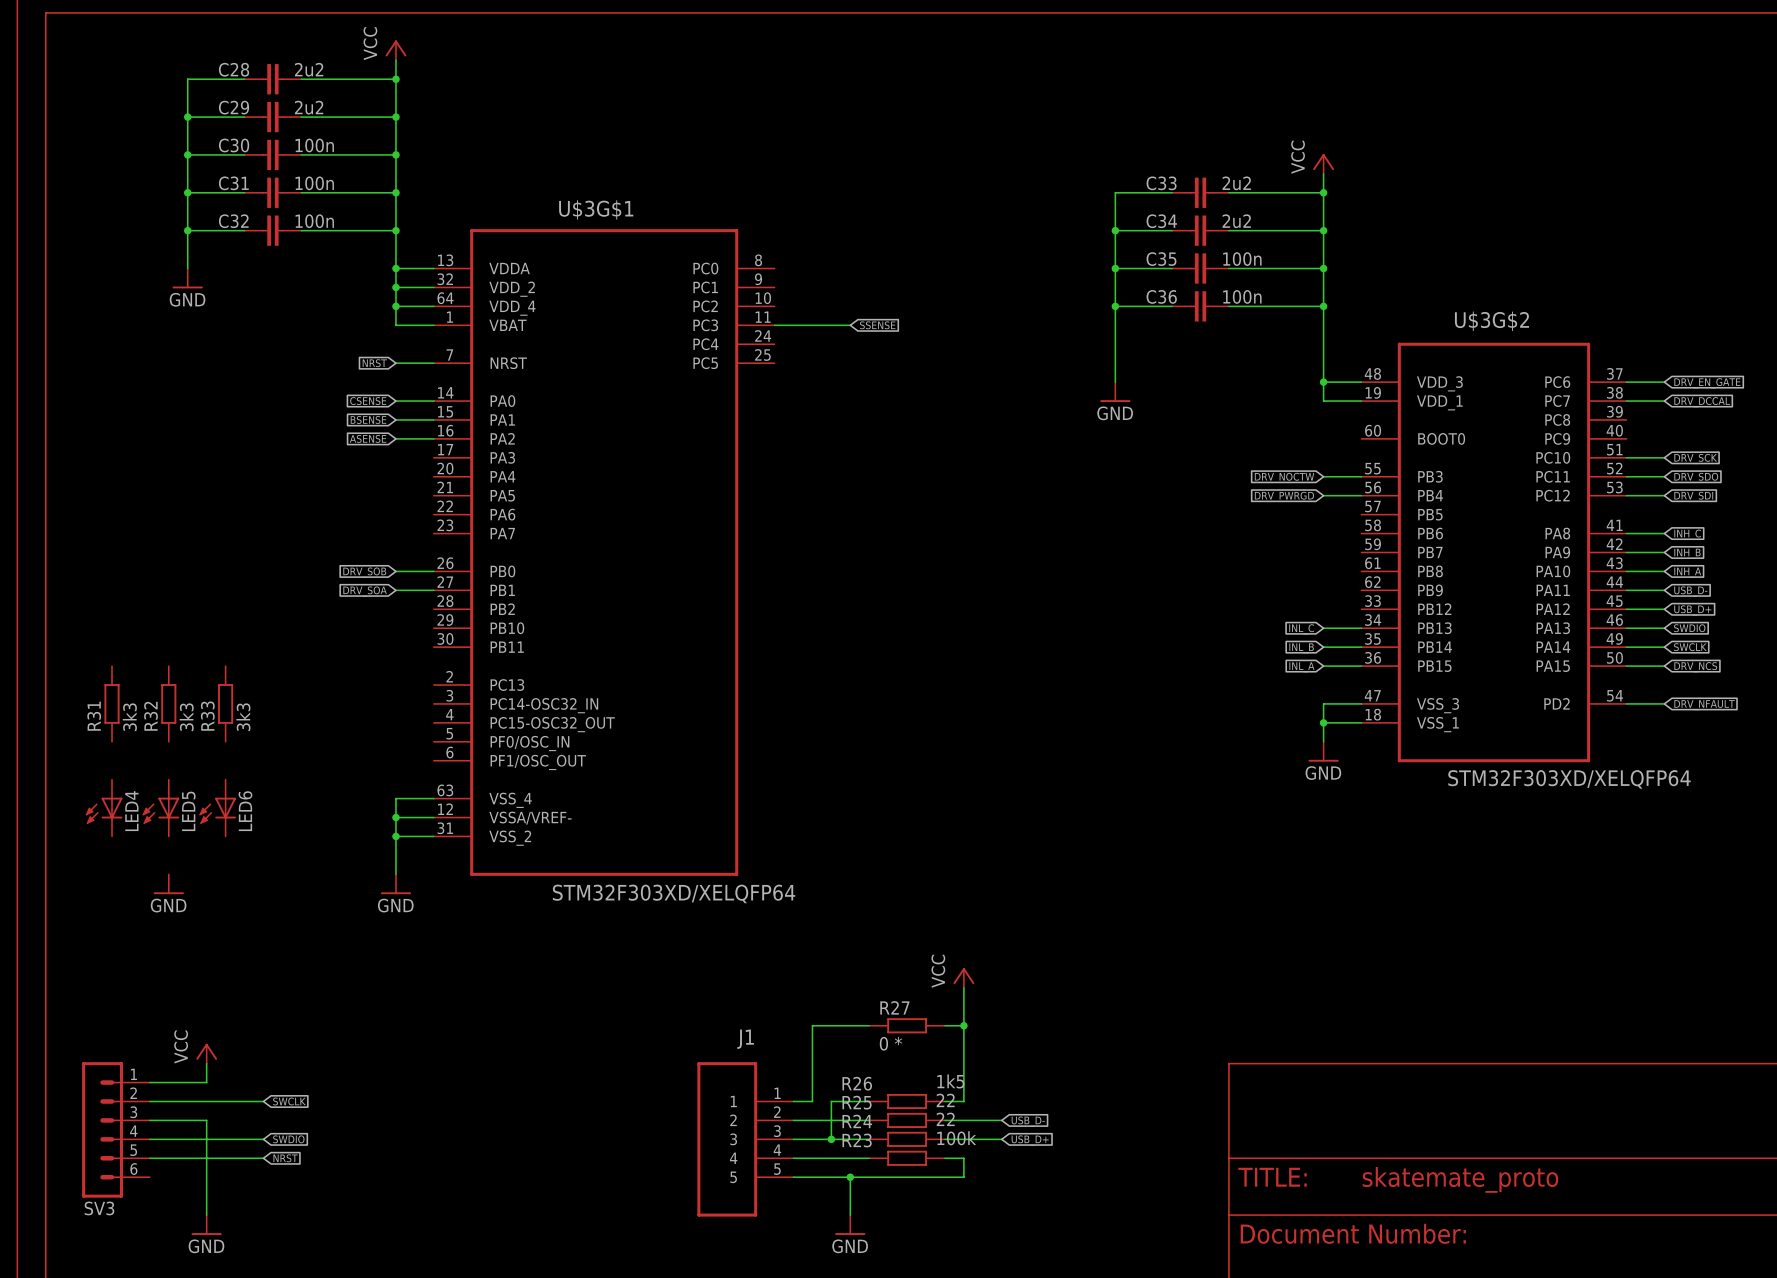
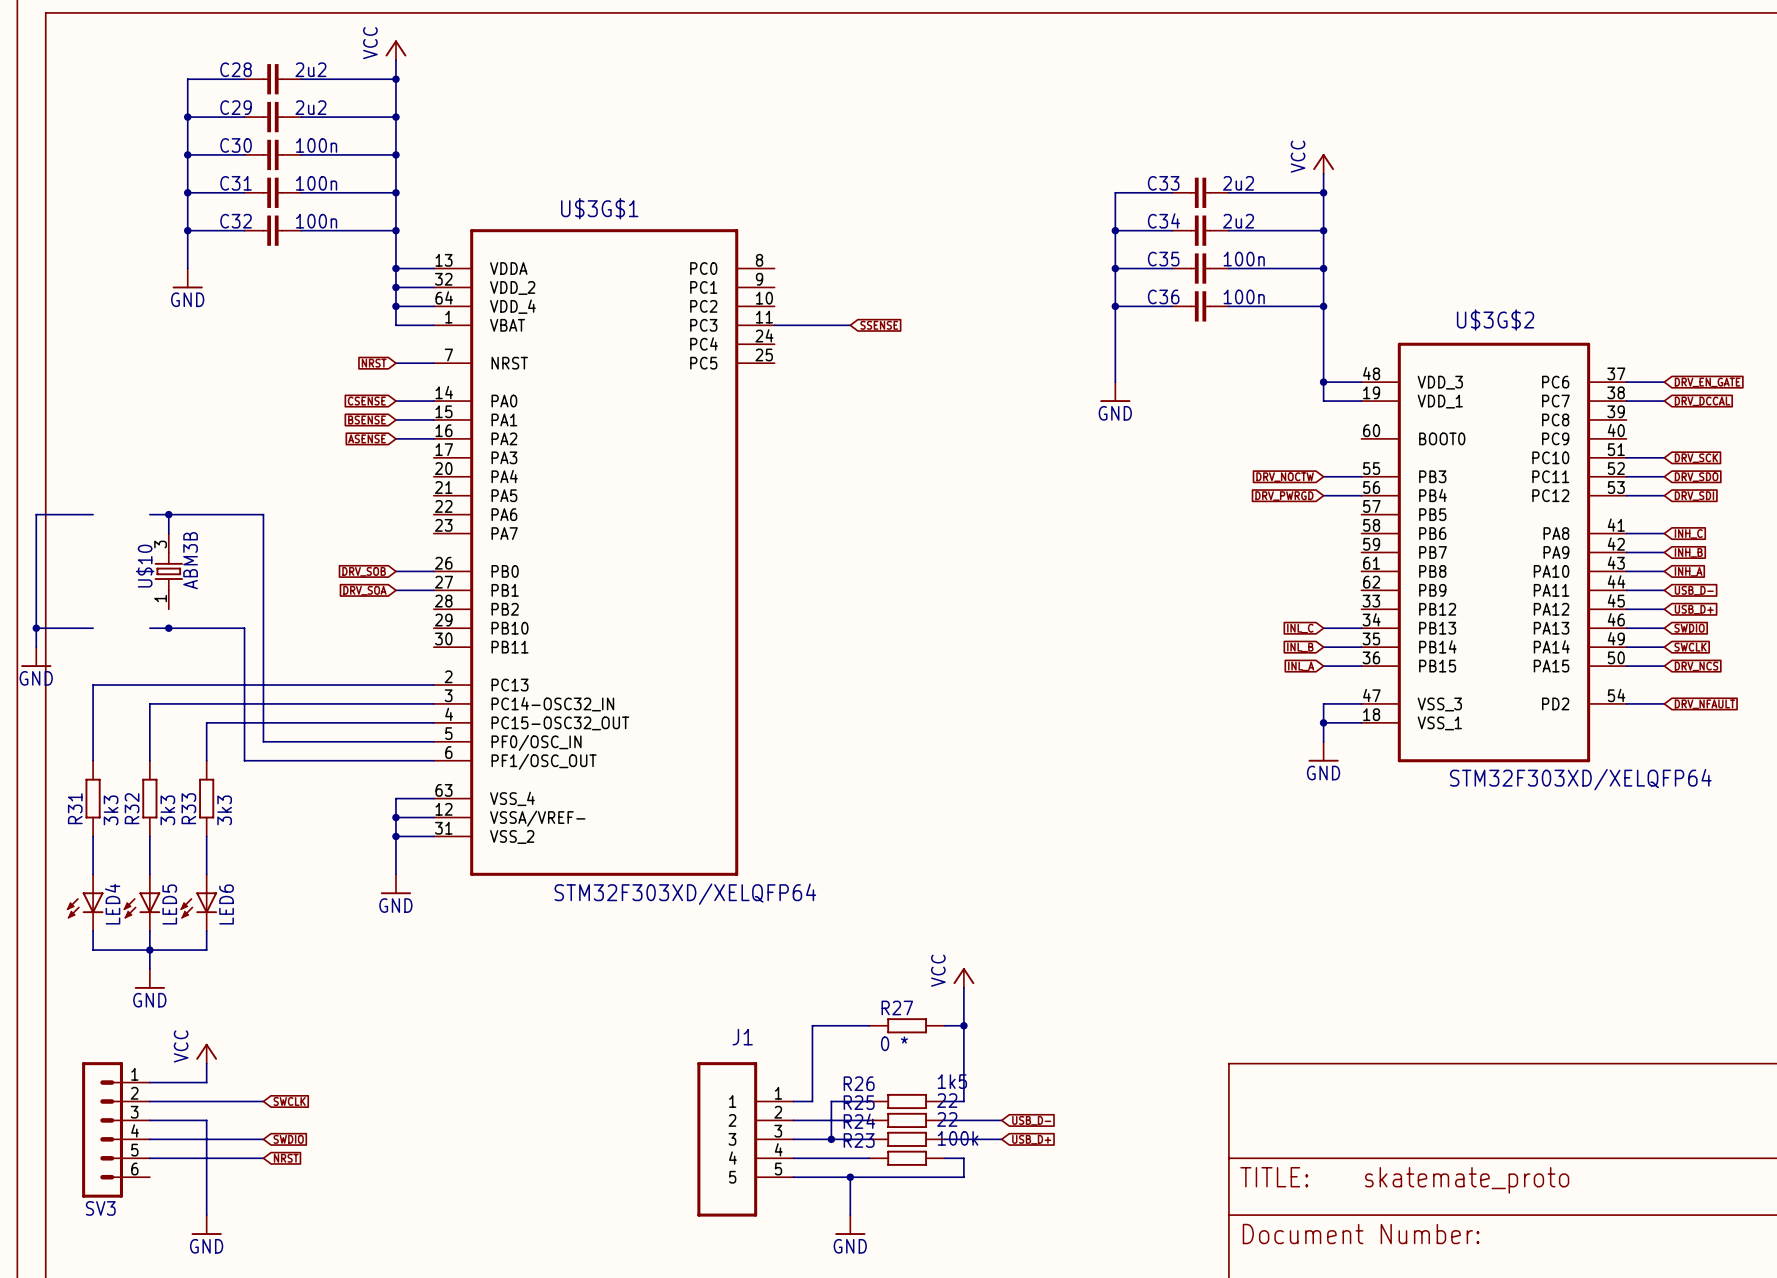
wire: none -> (93, 514) (36, 514) (36, 647)
wire: none -> (149, 514) (263, 514) (263, 741) (433, 741)
wire: none -> (168, 514) (168, 533)
junction: none -> (168, 514)
U$10: none -> ABM3B (168, 571)
wire: none -> (36, 628) (93, 628)
junction: none -> (36, 628)
wire: none -> (149, 628) (244, 628) (244, 760) (433, 760)
junction: none -> (168, 628)
power symbol: none -> GND (36, 657)
wire: none -> (433, 685) (93, 685) (93, 760)
R31 position: (112, 703) -> (93, 798)
R32 position: (168, 703) -> (149, 798)
R33 position: (225, 703) -> (206, 798)
wire: none -> (433, 703) (149, 703) (149, 760)
wire: none -> (433, 722) (206, 722) (206, 760)
LED4 position: (104, 808) -> (85, 902)
LED5 position: (160, 808) -> (142, 902)
LED6 position: (217, 808) -> (198, 902)
wire: none -> (93, 836) (93, 874)
wire: none -> (149, 836) (149, 874)
wire: none -> (206, 836) (206, 874)
power symbol position: GND (168, 884) -> GND (149, 978)
wire: none -> (93, 931) (93, 950) (206, 950) (206, 931)
wire: none -> (149, 931) (149, 968)
junction: none -> (149, 950)

